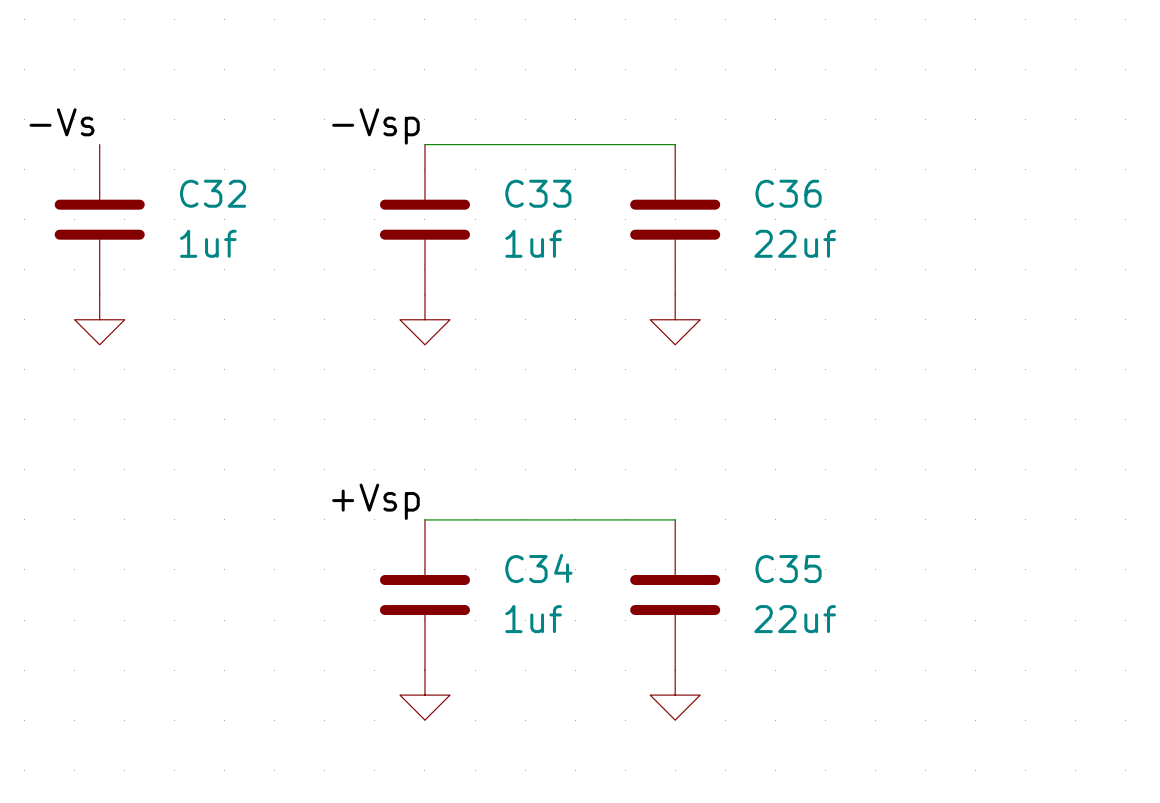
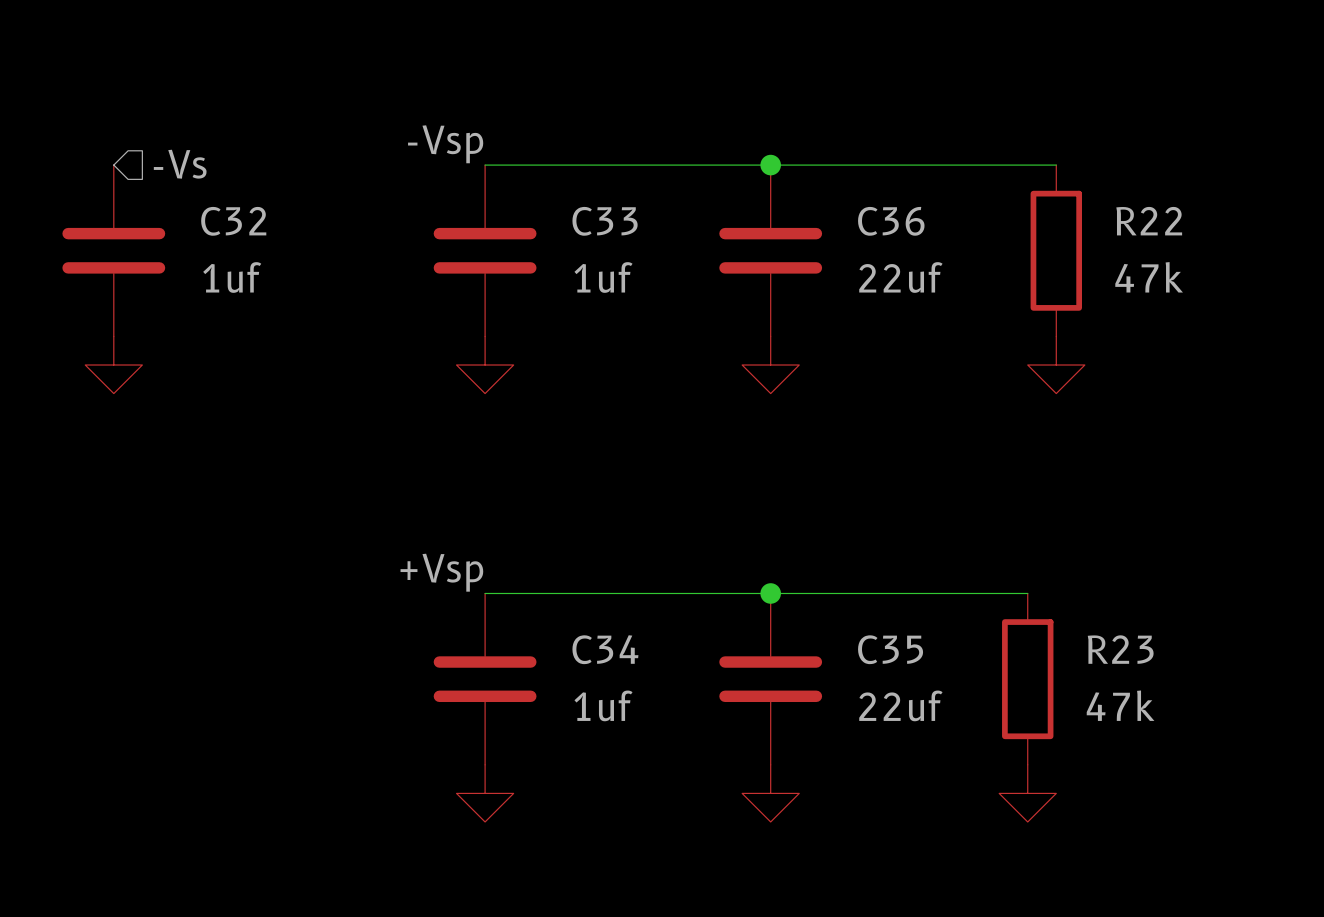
label: -Vs (61, 122) -> none
hierarchical label: none -> -Vs (180, 164)
wire: none -> (770, 165) (1056, 165)
junction: none -> (770, 165)
R22: none -> 47k (1056, 250)
power symbol: none -> (1056, 365)
wire: none -> (770, 593) (1027, 593)
junction: none -> (770, 593)
R23: none -> 47k (1027, 679)
power symbol: none -> (1027, 793)

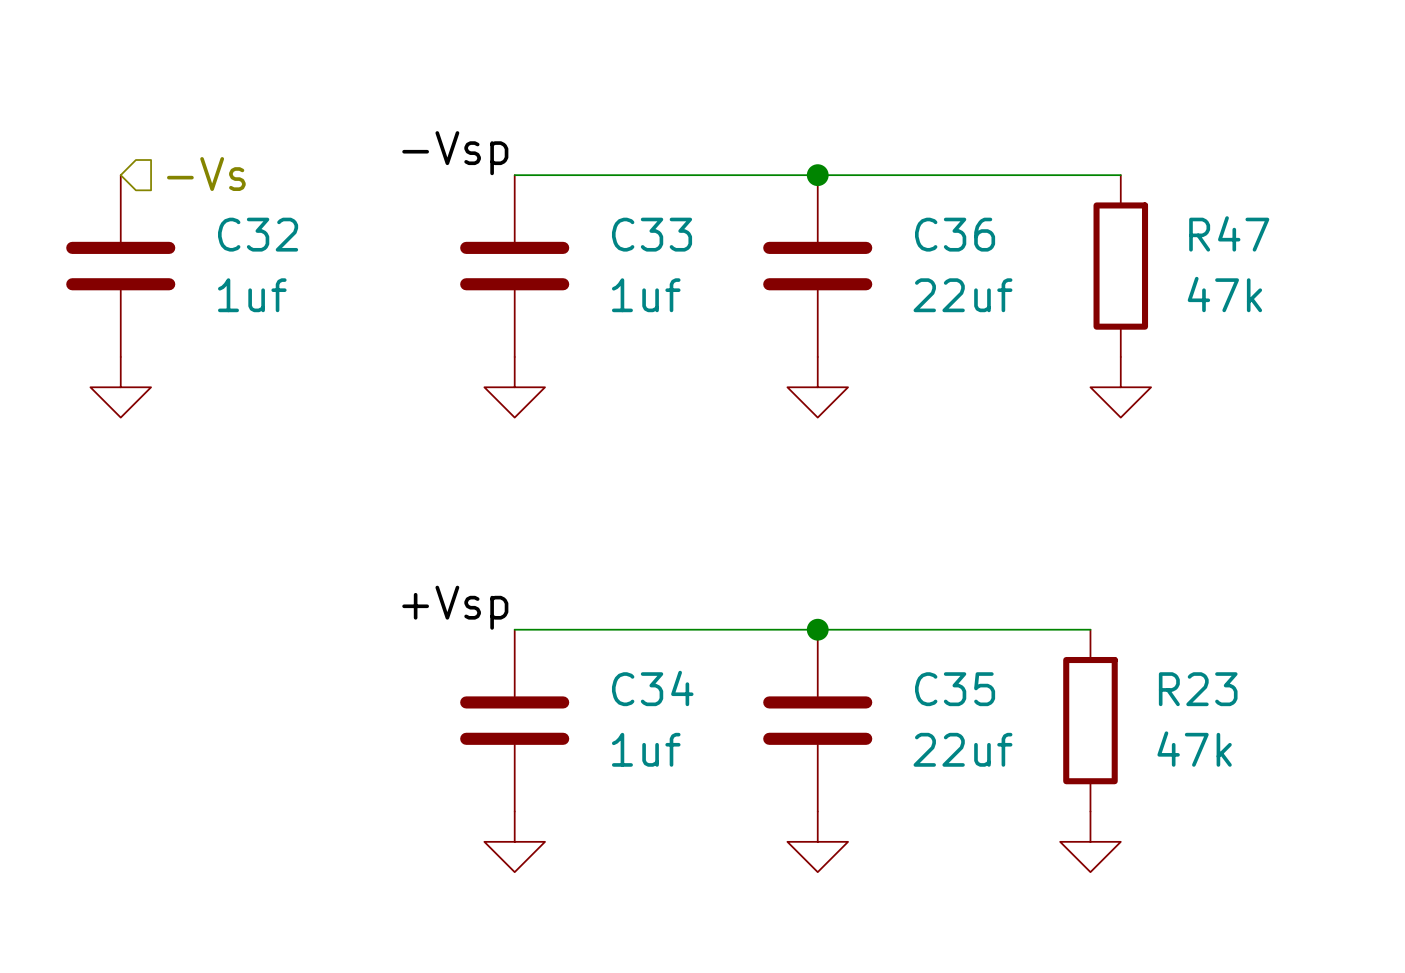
R22 name: R22 (1149, 221) -> R47 (1229, 233)

